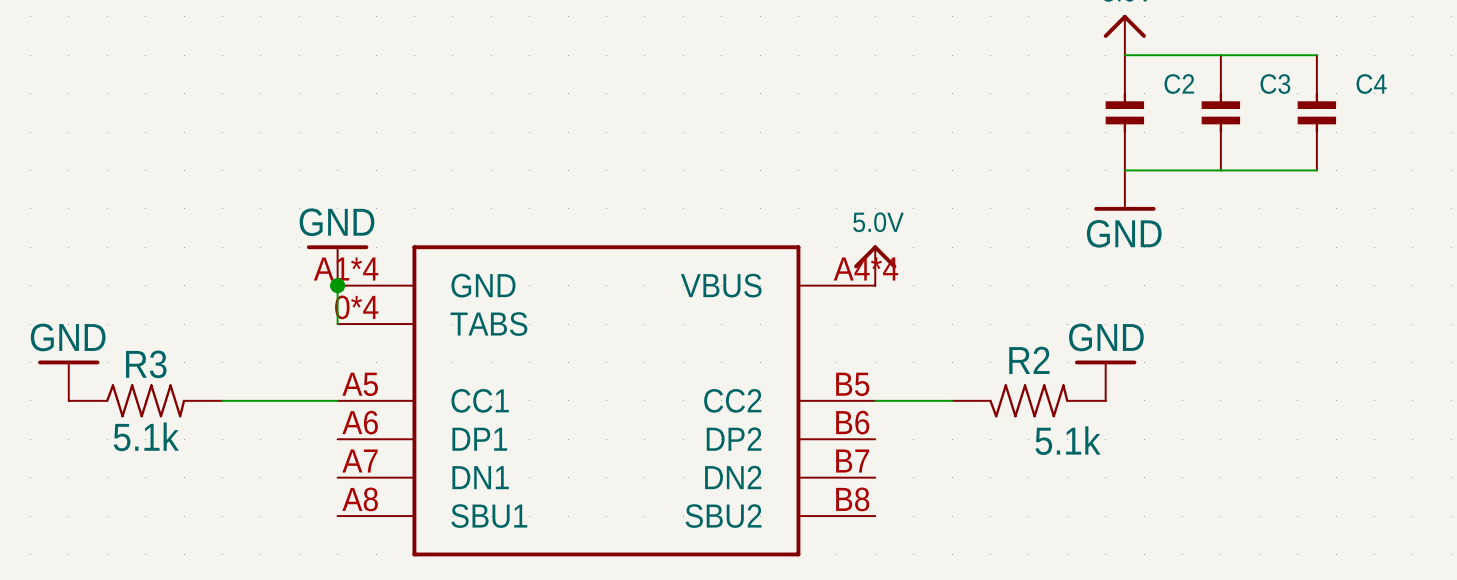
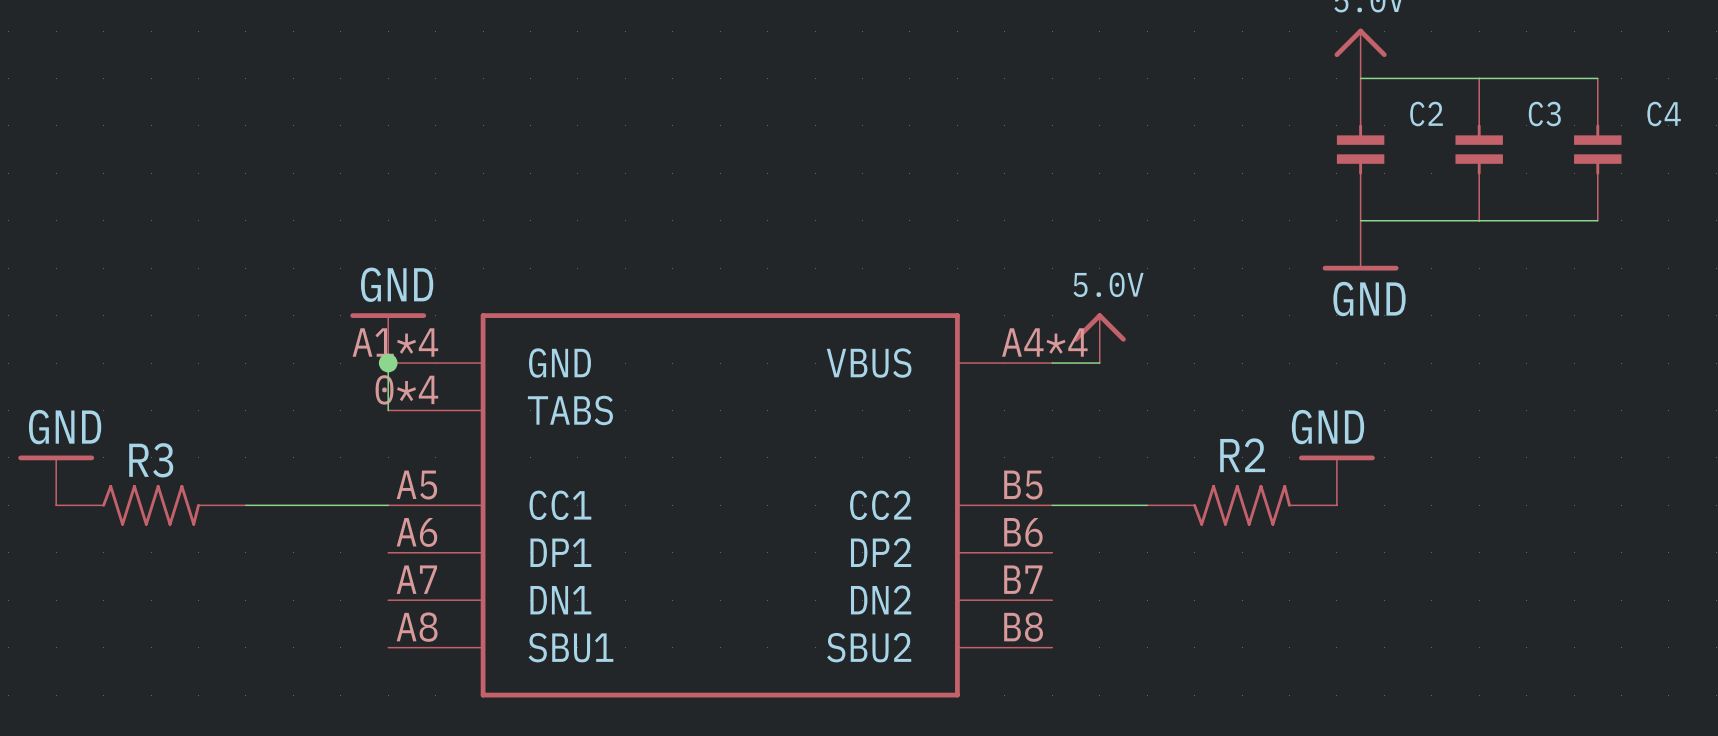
power symbol position: 5.0V (875, 265) -> 5.0V (1099, 338)
wire: none -> (1052, 363) (1099, 363)
R3 value: 5.1k (146, 436) -> none
R2 value: 5.1k (1068, 440) -> none

